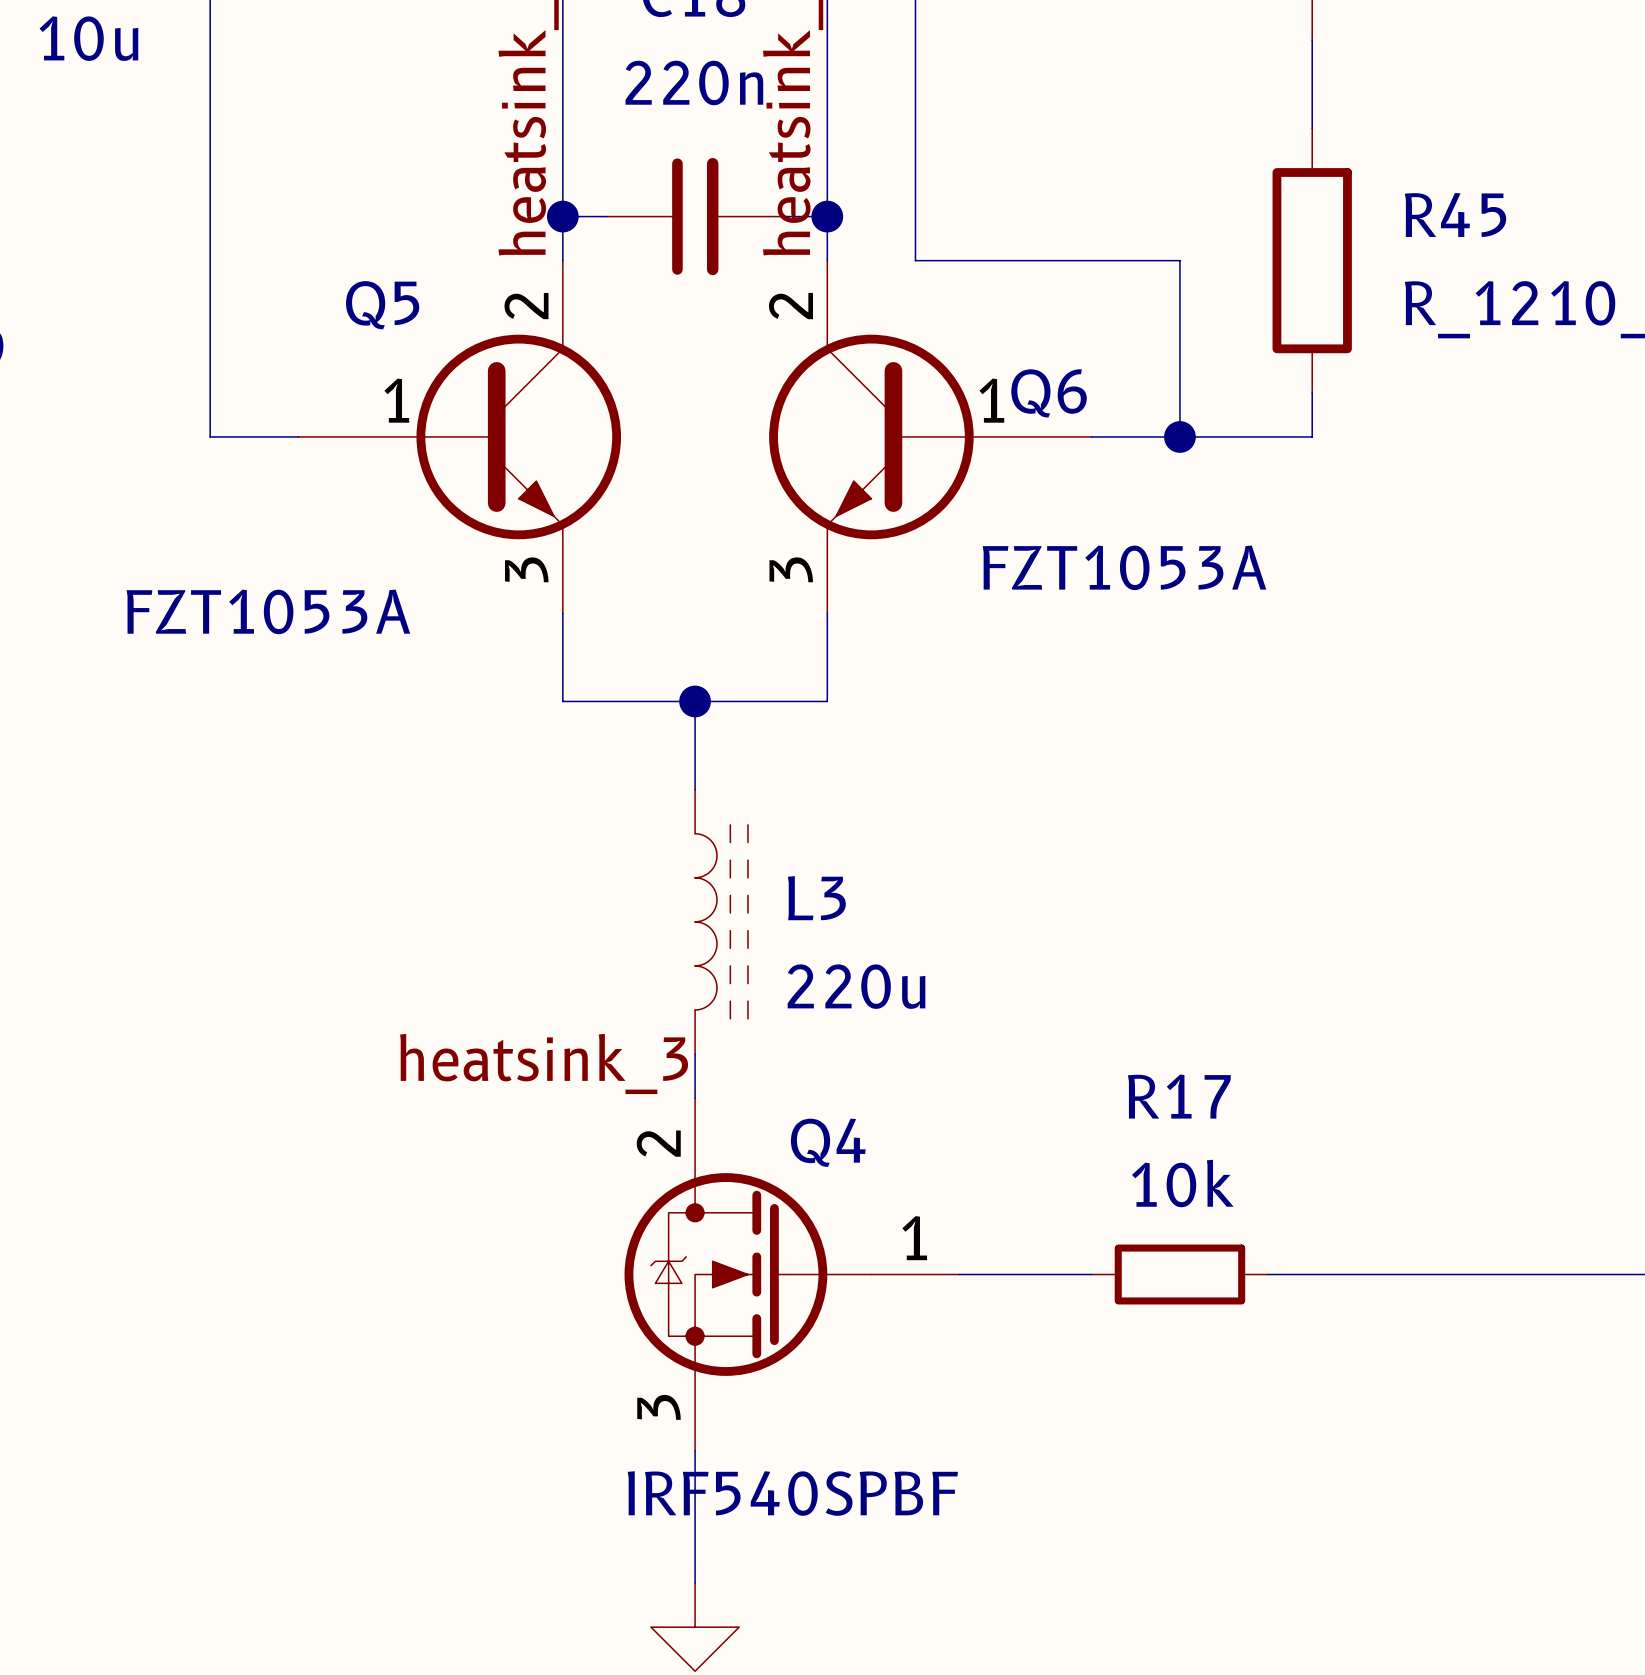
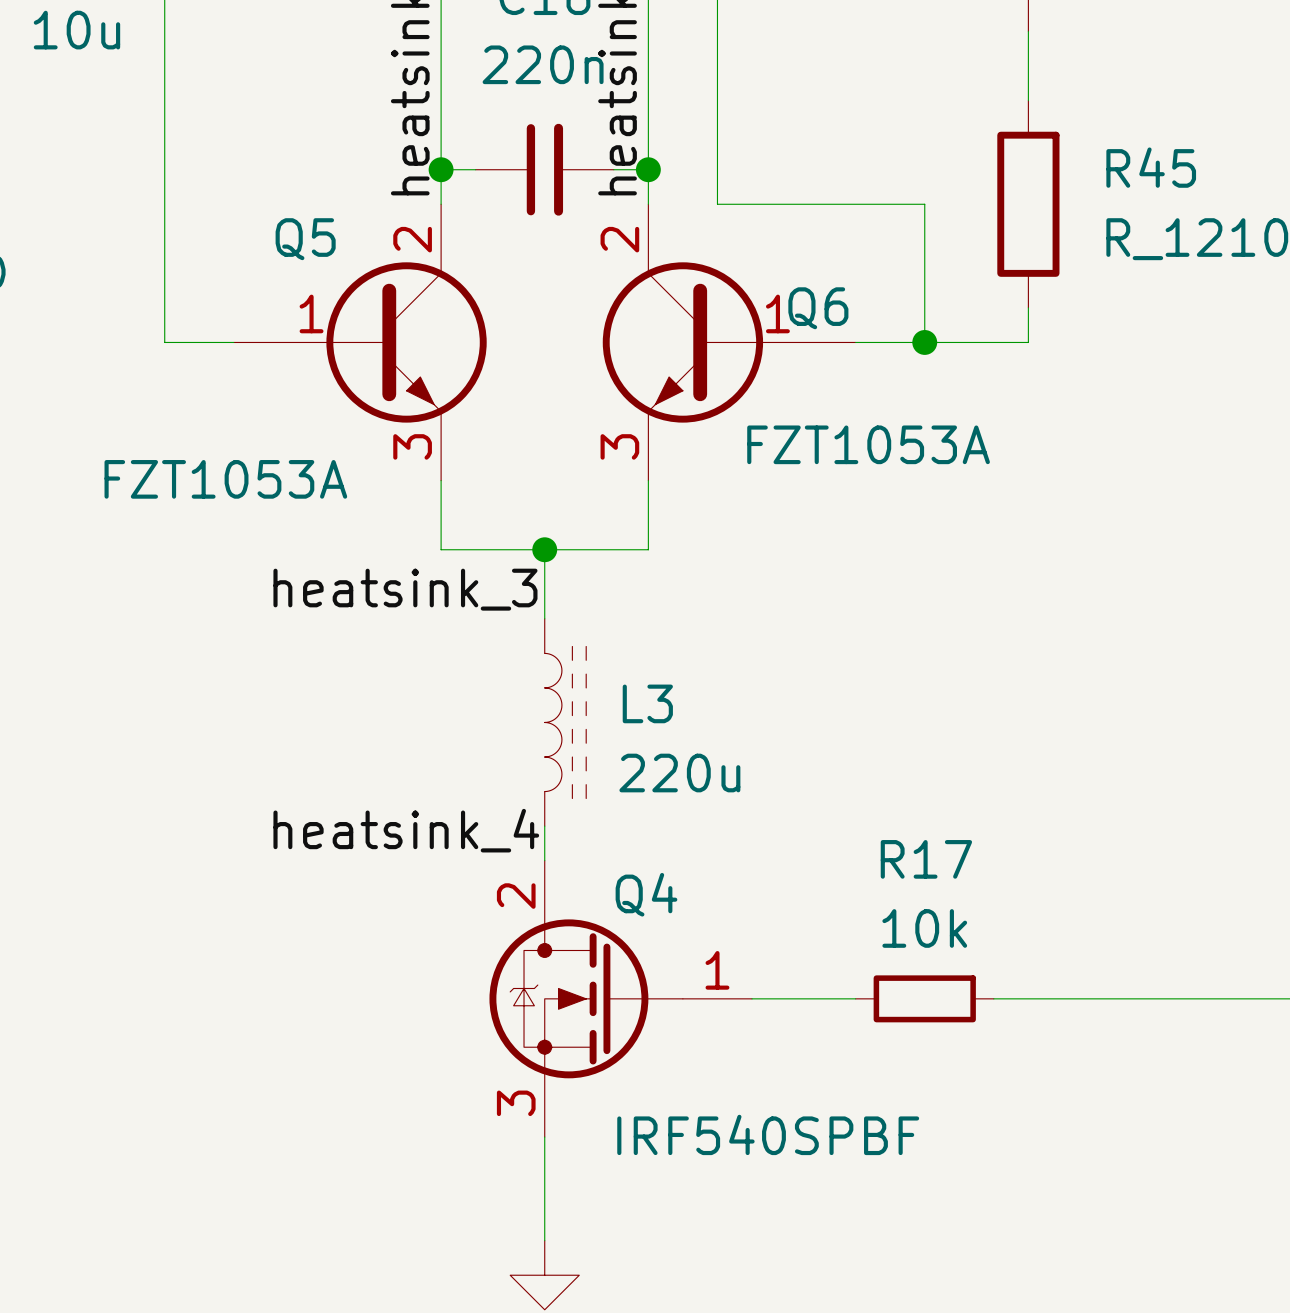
label: none -> heatsink_3 (405, 589)
label: heatsink_3 (544, 1064) -> heatsink_4 (406, 830)
Q4 value position: IRF540SPBF (792, 1493) -> IRF540SPBF (768, 1134)

